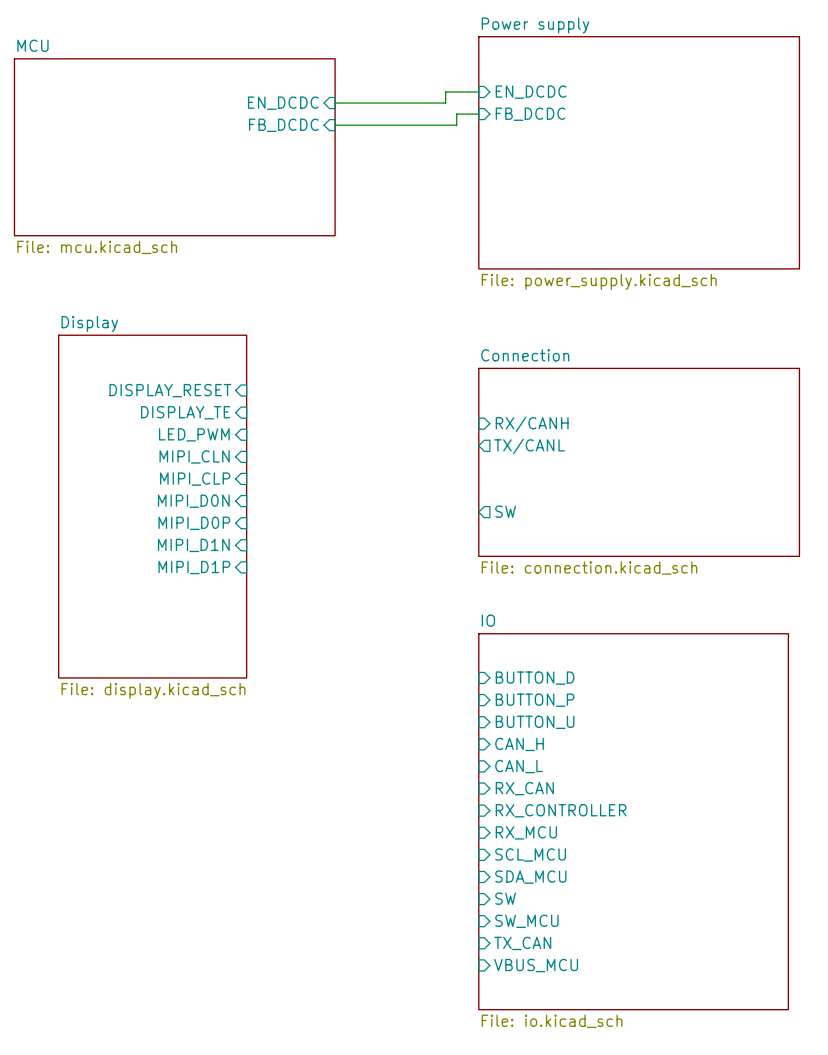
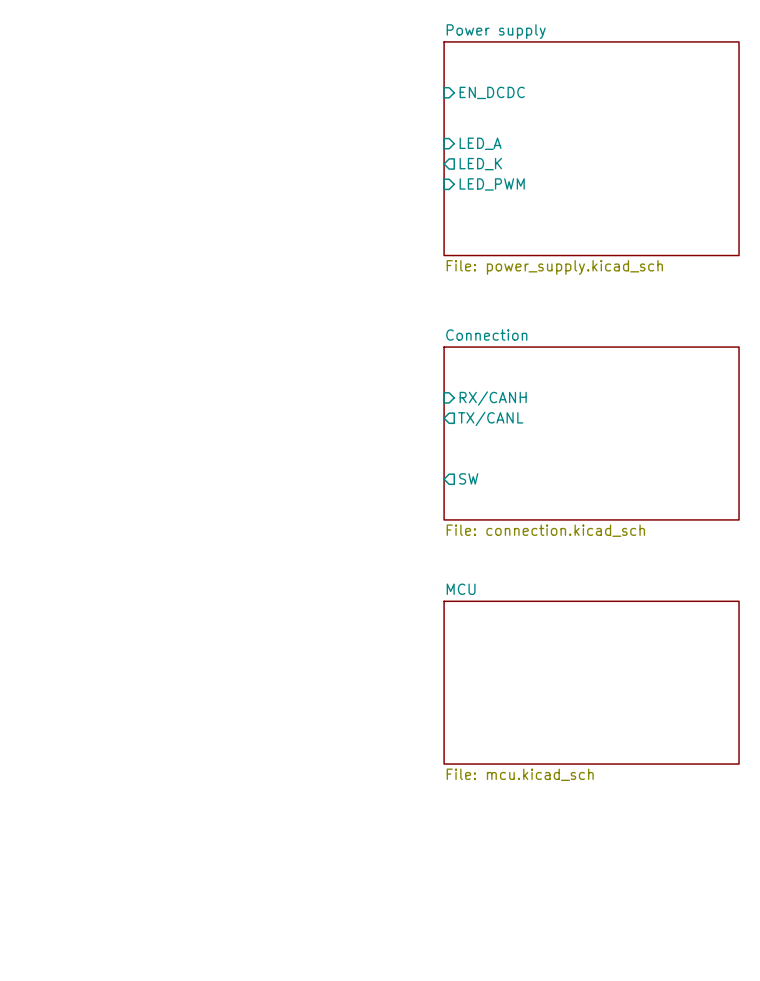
wire: (478, 91) (445, 91) (445, 103) (335, 103) -> none
sheet pin: EN_DCDC (283, 103) -> none
wire: (478, 114) (456, 114) (456, 125) (335, 125) -> none
sheet pin: FB_DCDC (530, 114) -> none
sheet pin: FB_DCDC (283, 125) -> none
sheet MCU: File: mcu.kicad_sch (174, 147) -> none
sheet pin: none -> LED_A (480, 143)
sheet pin: none -> LED_K (480, 164)
sheet pin: none -> LED_PWM (492, 184)
sheet pin: DISPLAY_RESET (170, 390) -> none
sheet pin: DISPLAY_TE (185, 412) -> none
sheet pin: LED_PWM (194, 434) -> none
sheet pin: MIPI_CLN (194, 456) -> none
sheet pin: MIPI_CLP (195, 479) -> none
sheet pin: MIPI_D0N (193, 501) -> none
sheet Display: File: display.kicad_sch (152, 506) -> none
sheet pin: MIPI_D0P (194, 523) -> none
sheet pin: MIPI_D1N (193, 545) -> none
sheet pin: MIPI_D1P (194, 567) -> none
sheet pin: BUTTON_D (535, 678) -> none
sheet pin: BUTTON_P (535, 700) -> none
sheet pin: BUTTON_U (535, 722) -> none
sheet MCU: none -> File: mcu.kicad_sch (591, 682)
sheet pin: CAN_H (519, 744) -> none
sheet pin: CAN_L (519, 766) -> none
sheet pin: RX_CAN (524, 788) -> none
sheet pin: RX_CONTROLLER (561, 810) -> none
sheet IO: File: io.kicad_sch (633, 821) -> none
sheet pin: RX_MCU (526, 832) -> none
sheet pin: SCL_MCU (530, 854) -> none
sheet pin: SDA_MCU (530, 877) -> none
sheet pin: SW (505, 898) -> none
sheet pin: SW_MCU (526, 921) -> none
sheet pin: TX_CAN (522, 943) -> none
sheet pin: VBUS_MCU (536, 965) -> none

